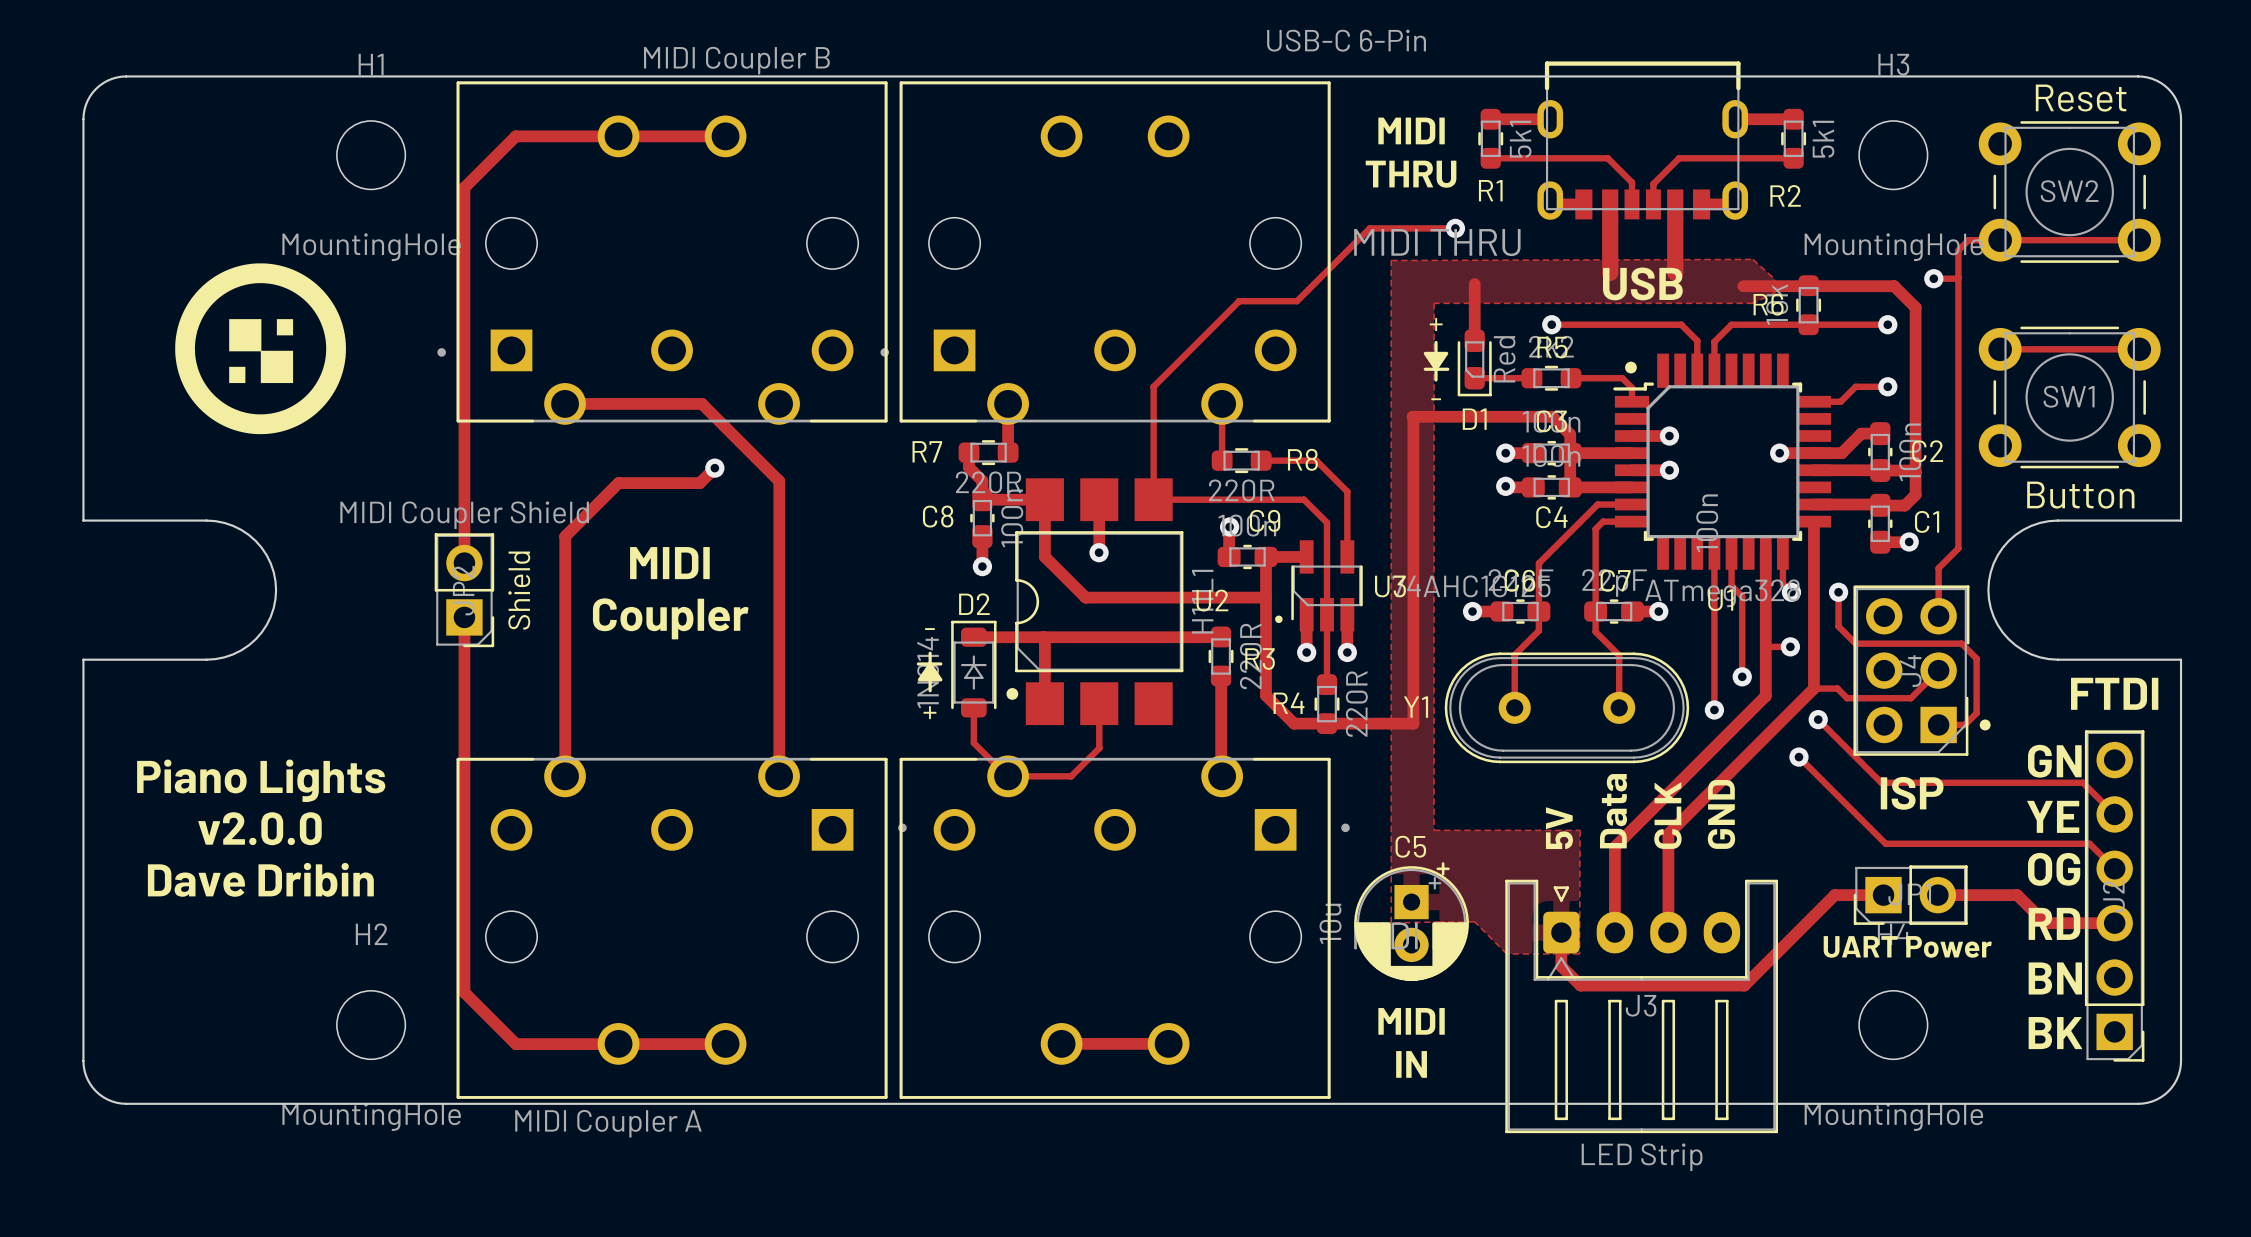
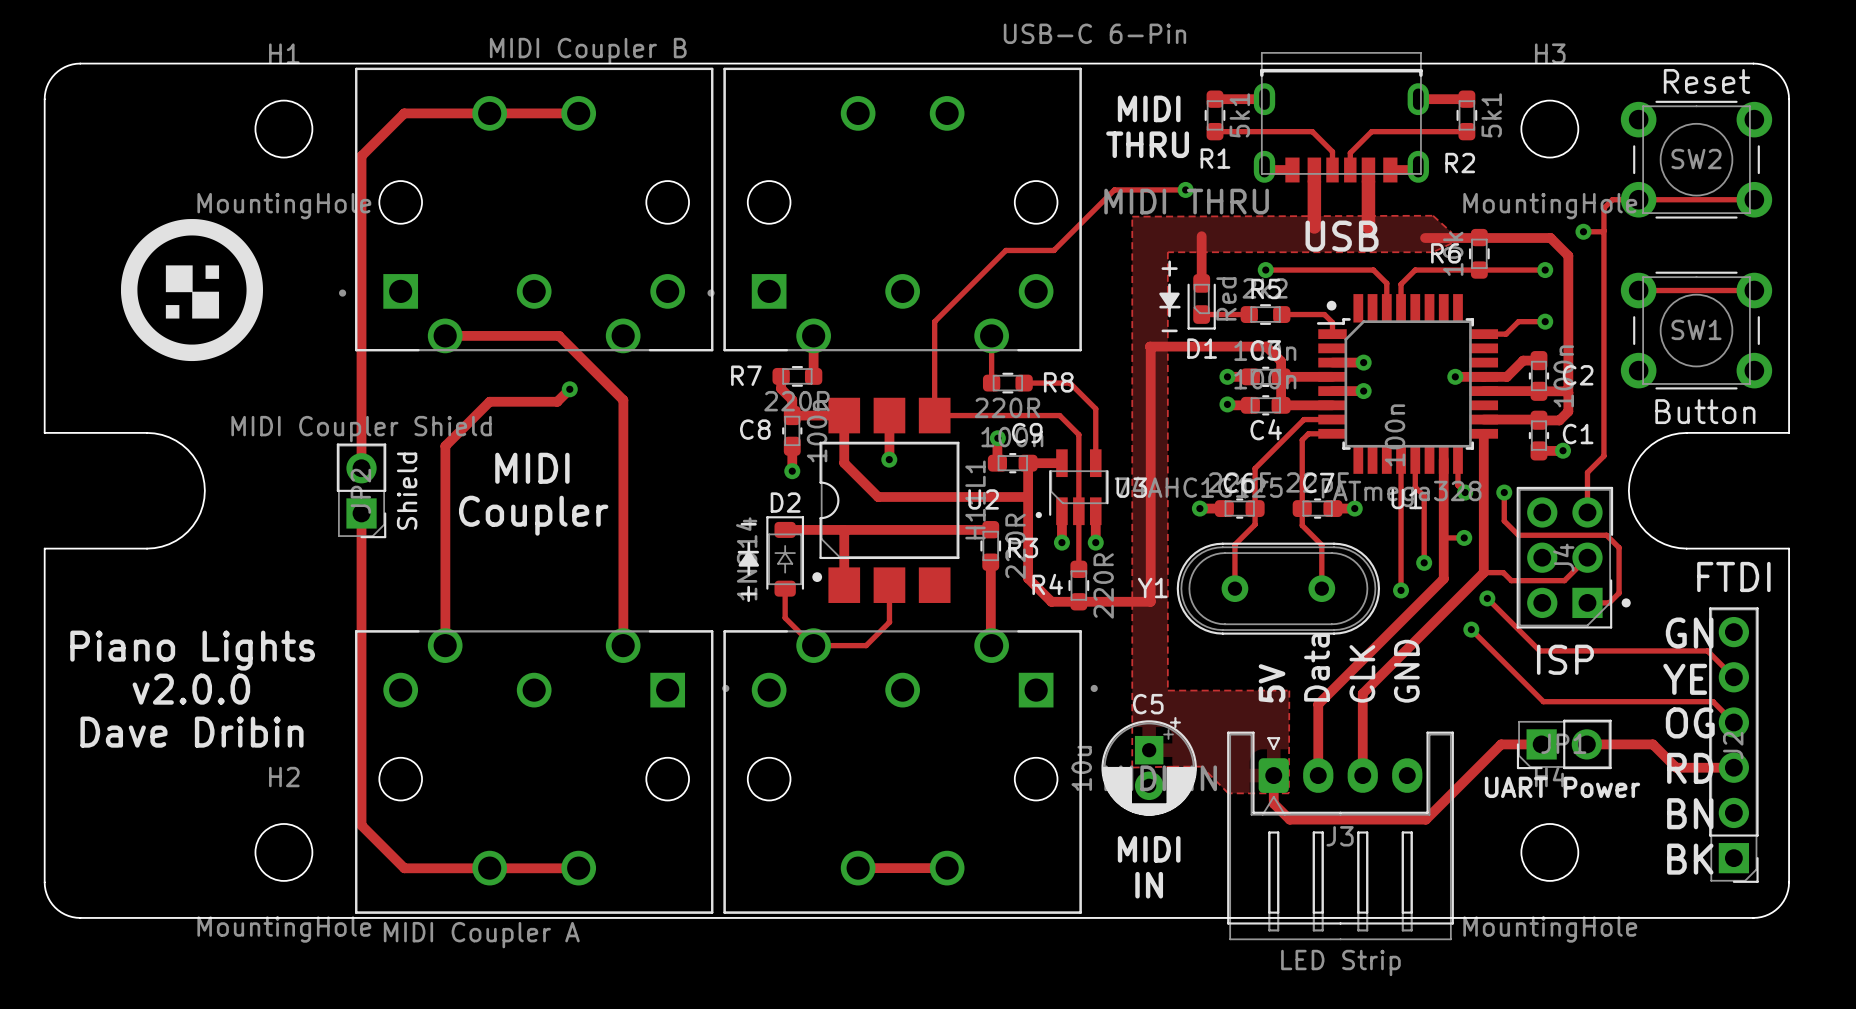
part footprint: [1537, 61, 1749, 220] -> [1253, 51, 1429, 183]
J3 footprint: [1505, 879, 1778, 1134] -> [1227, 731, 1454, 941]

